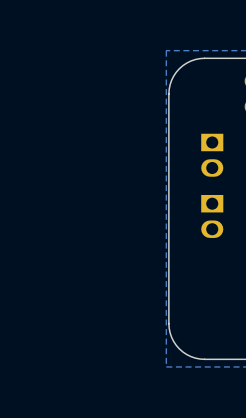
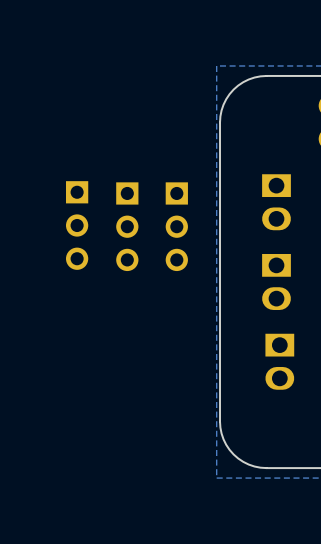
part: none -> (77, 225)
part: none -> (127, 226)
part: none -> (176, 226)
part: none -> (279, 361)

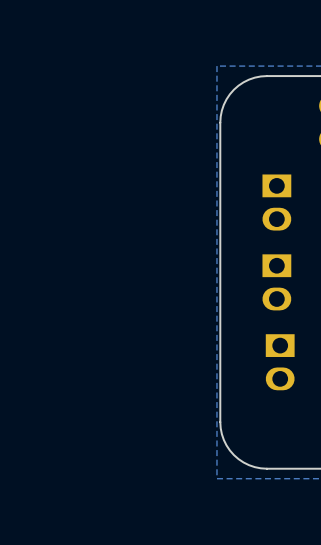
part: (77, 225) -> none
part: (127, 226) -> none
part: (176, 226) -> none

